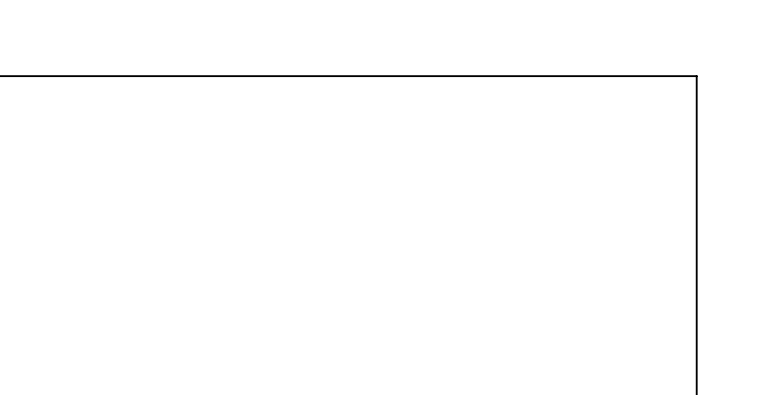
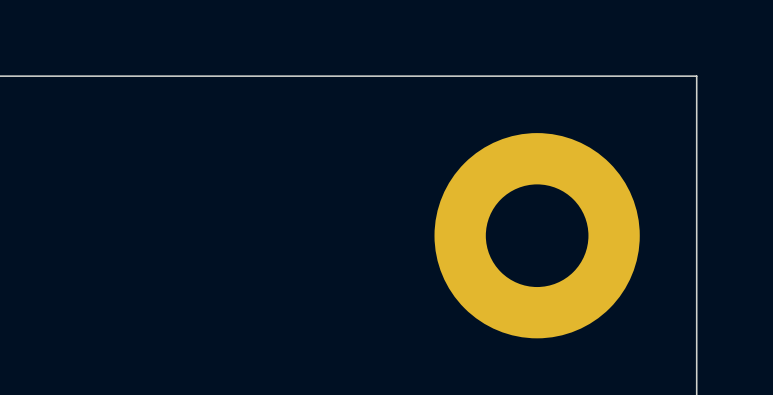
part: none -> (537, 235)

